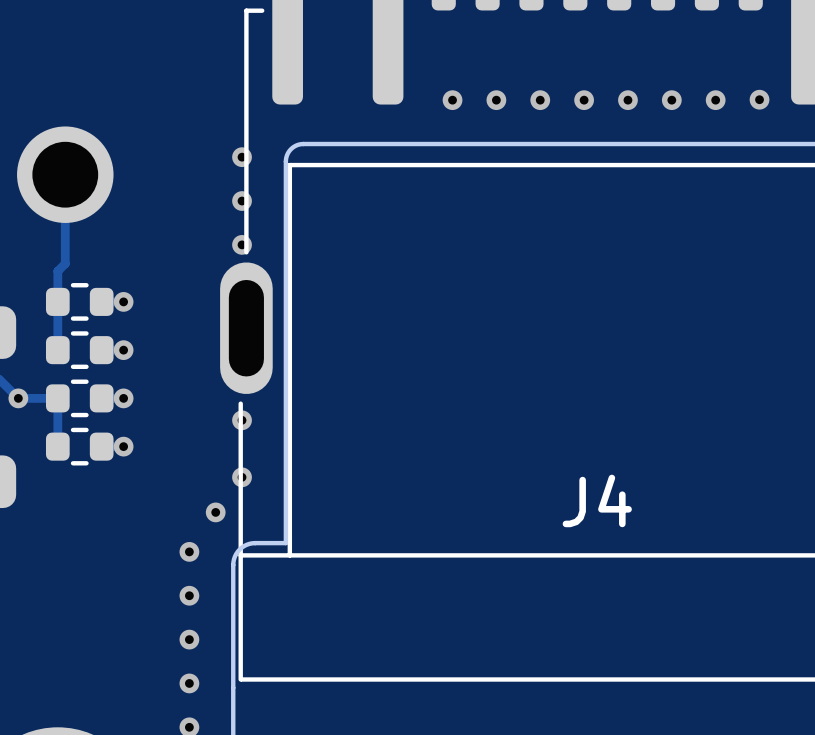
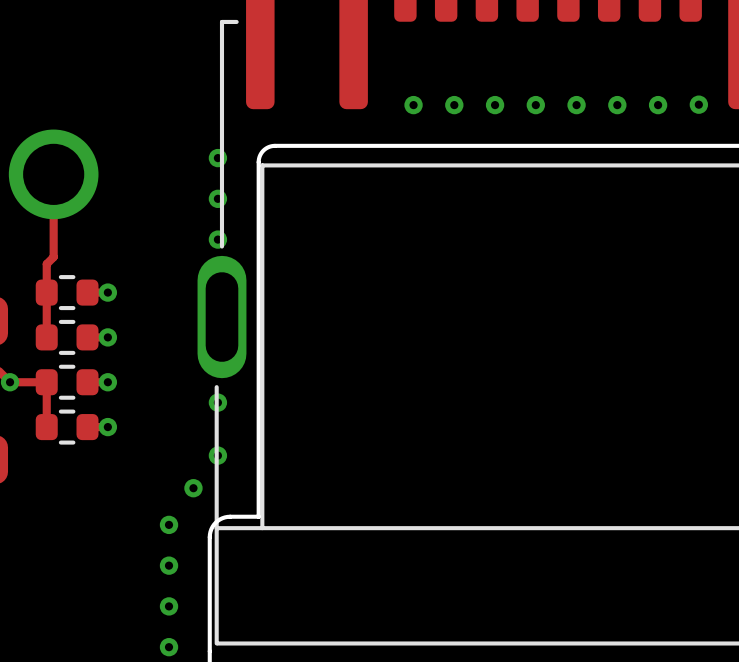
J4 name: J4 (597, 500) -> none

